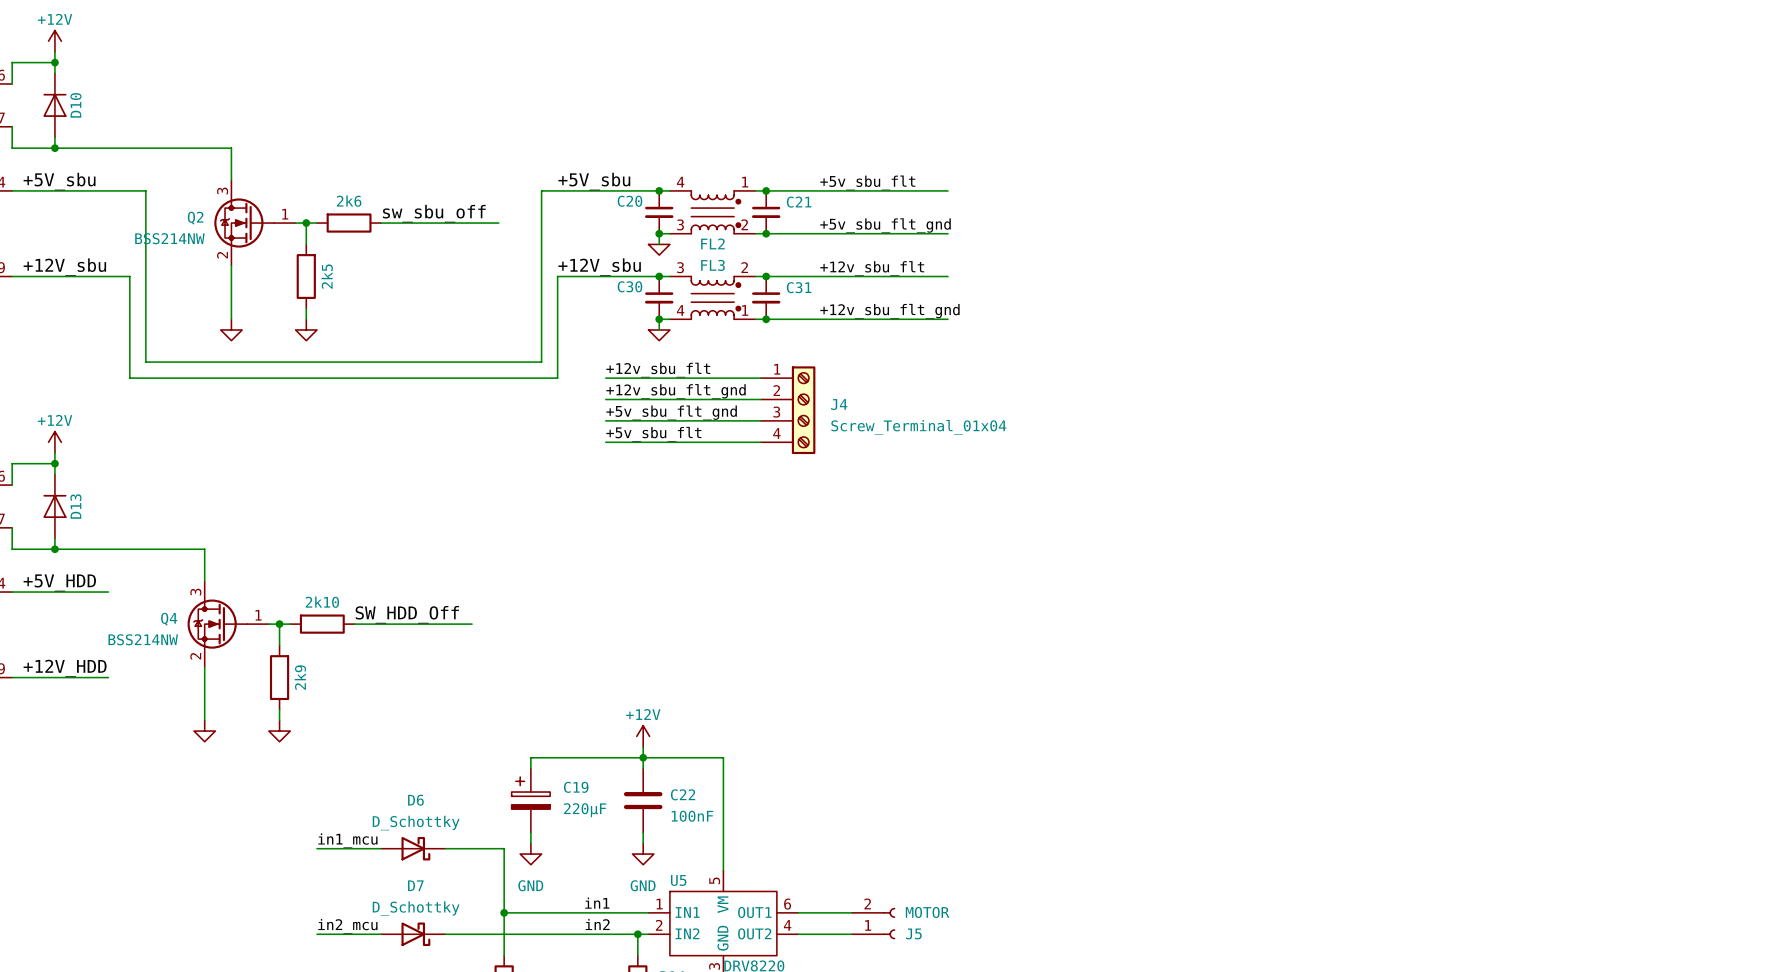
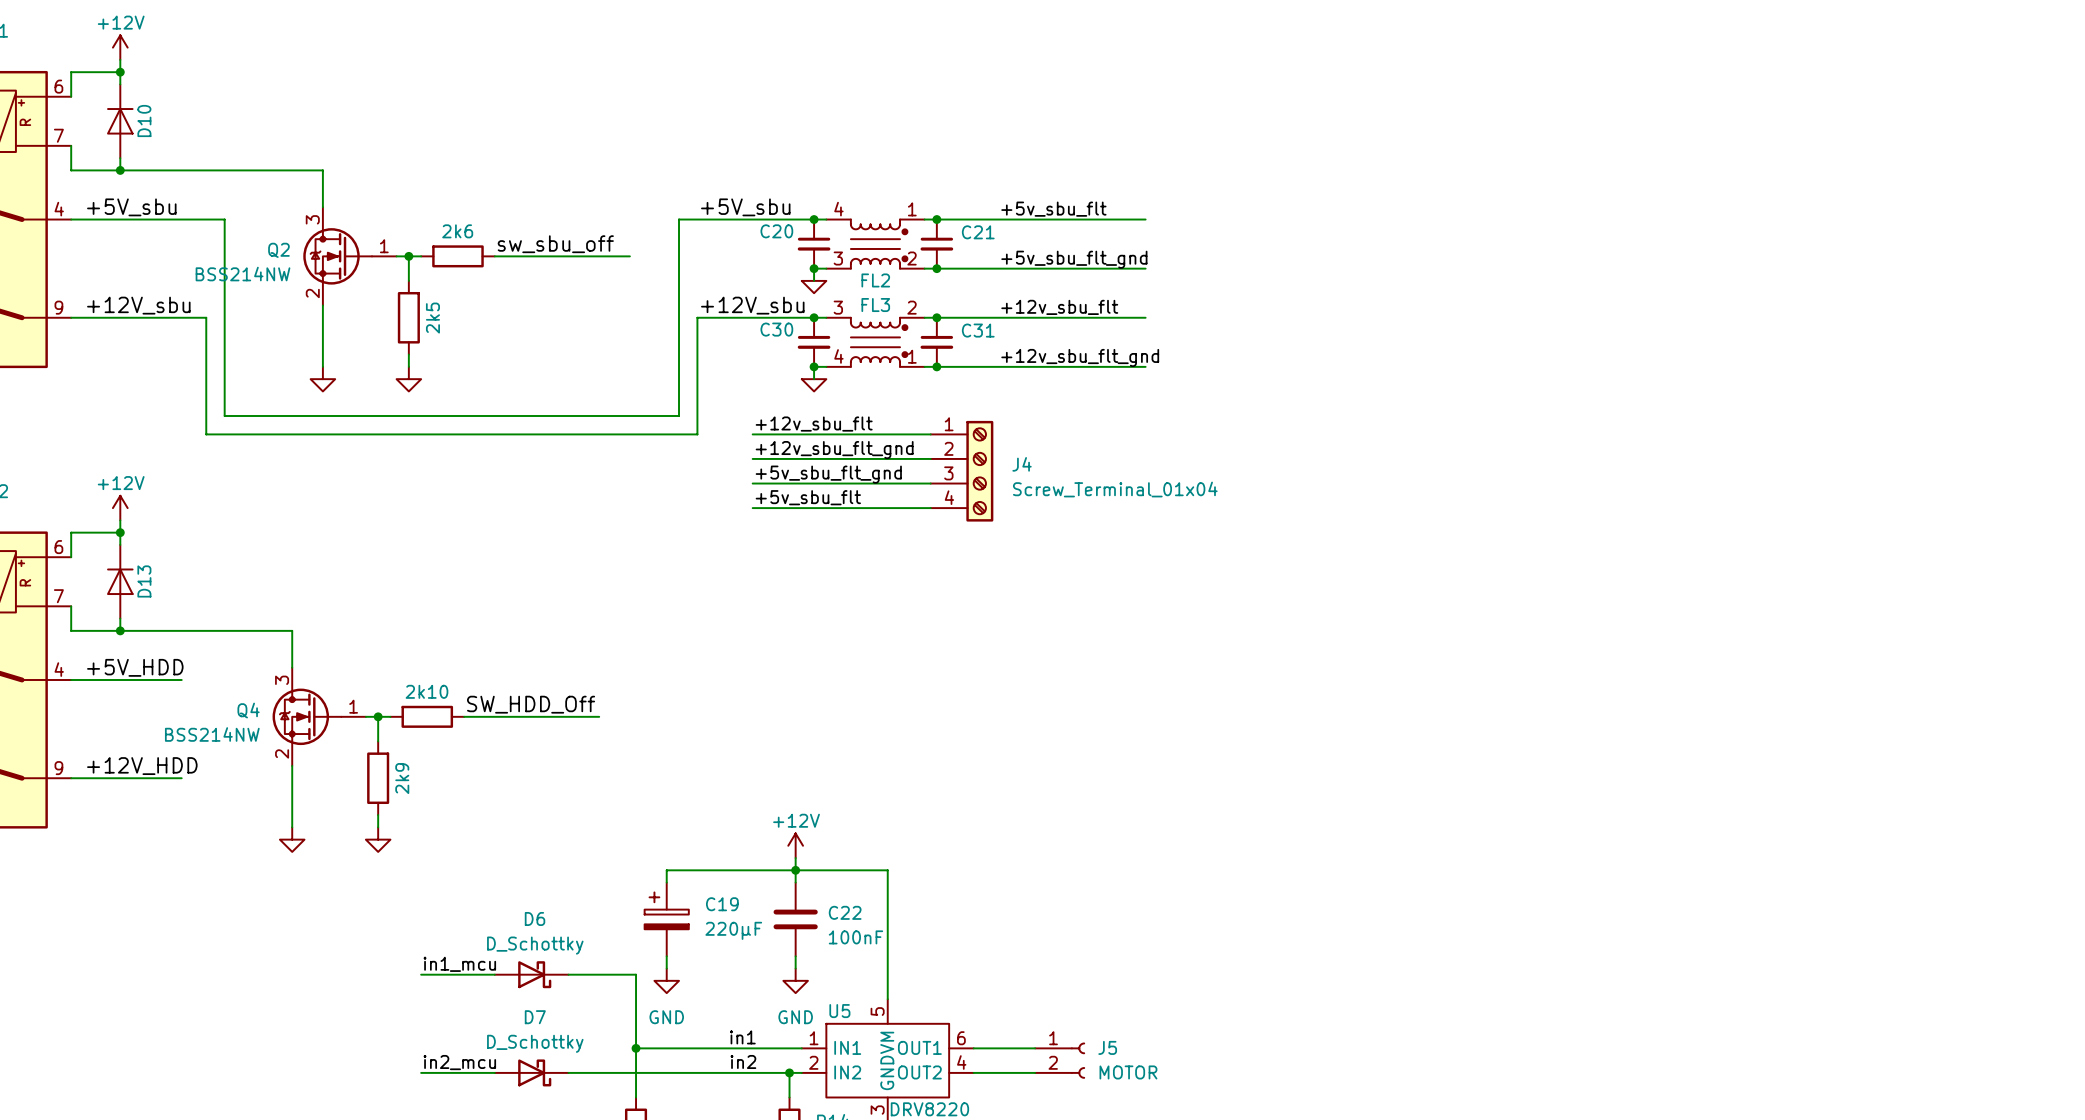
J5 flip: as is (889, 923) -> up-down (1078, 1060)

